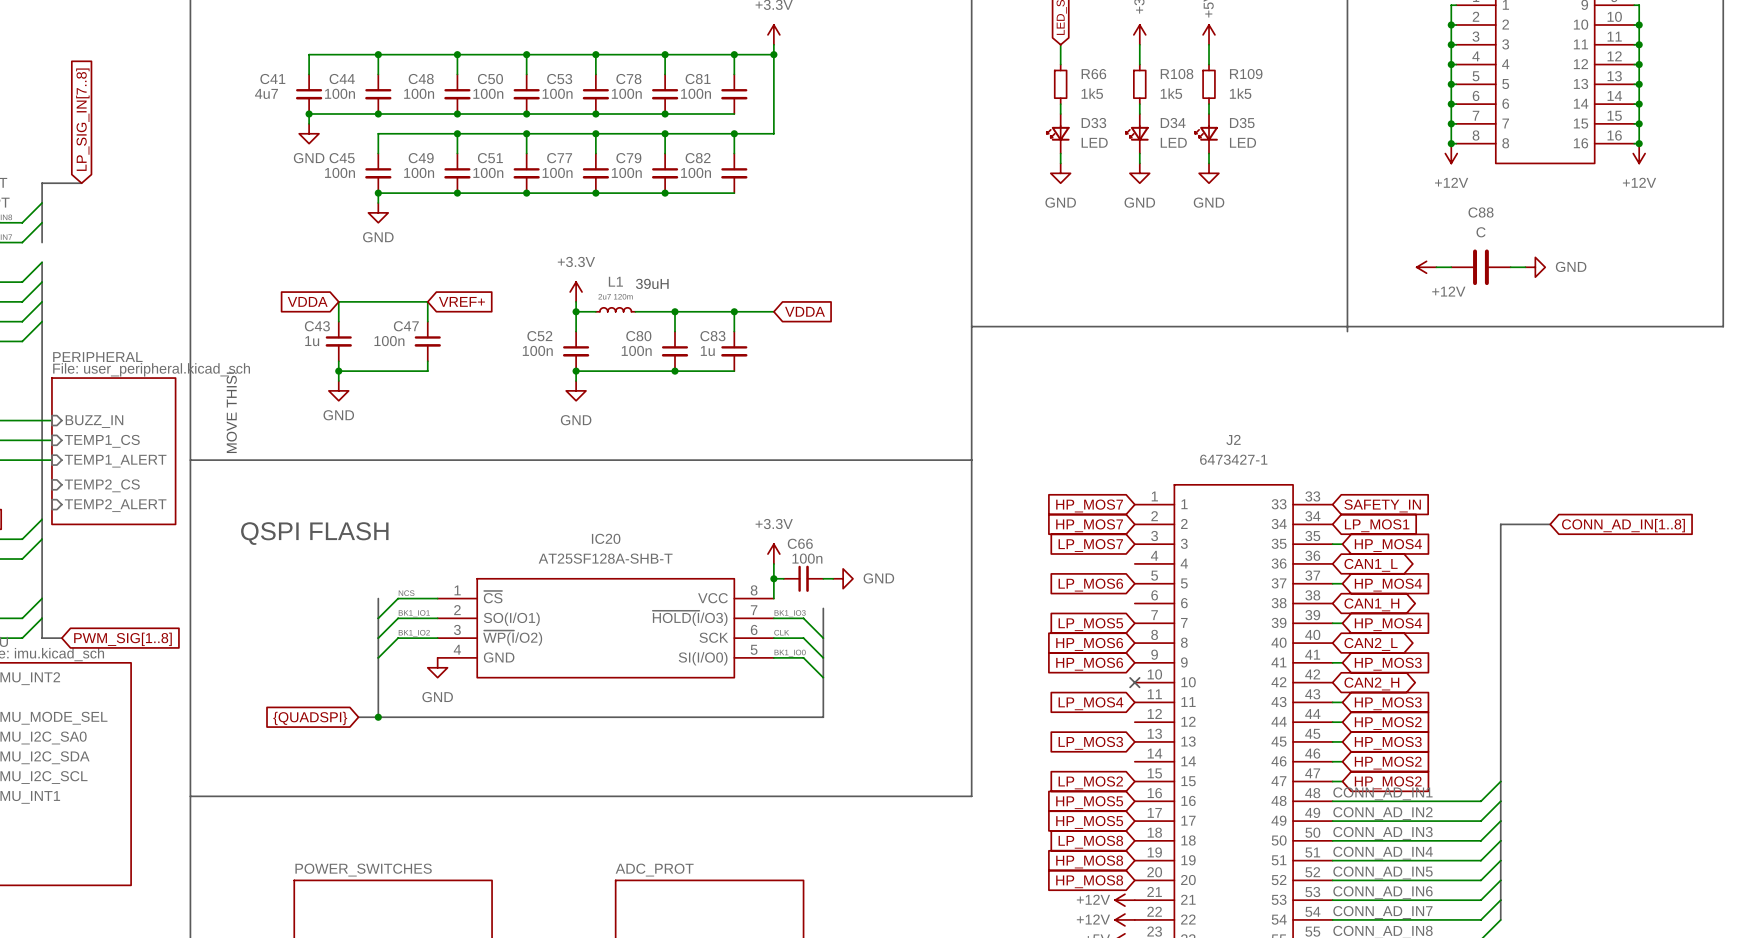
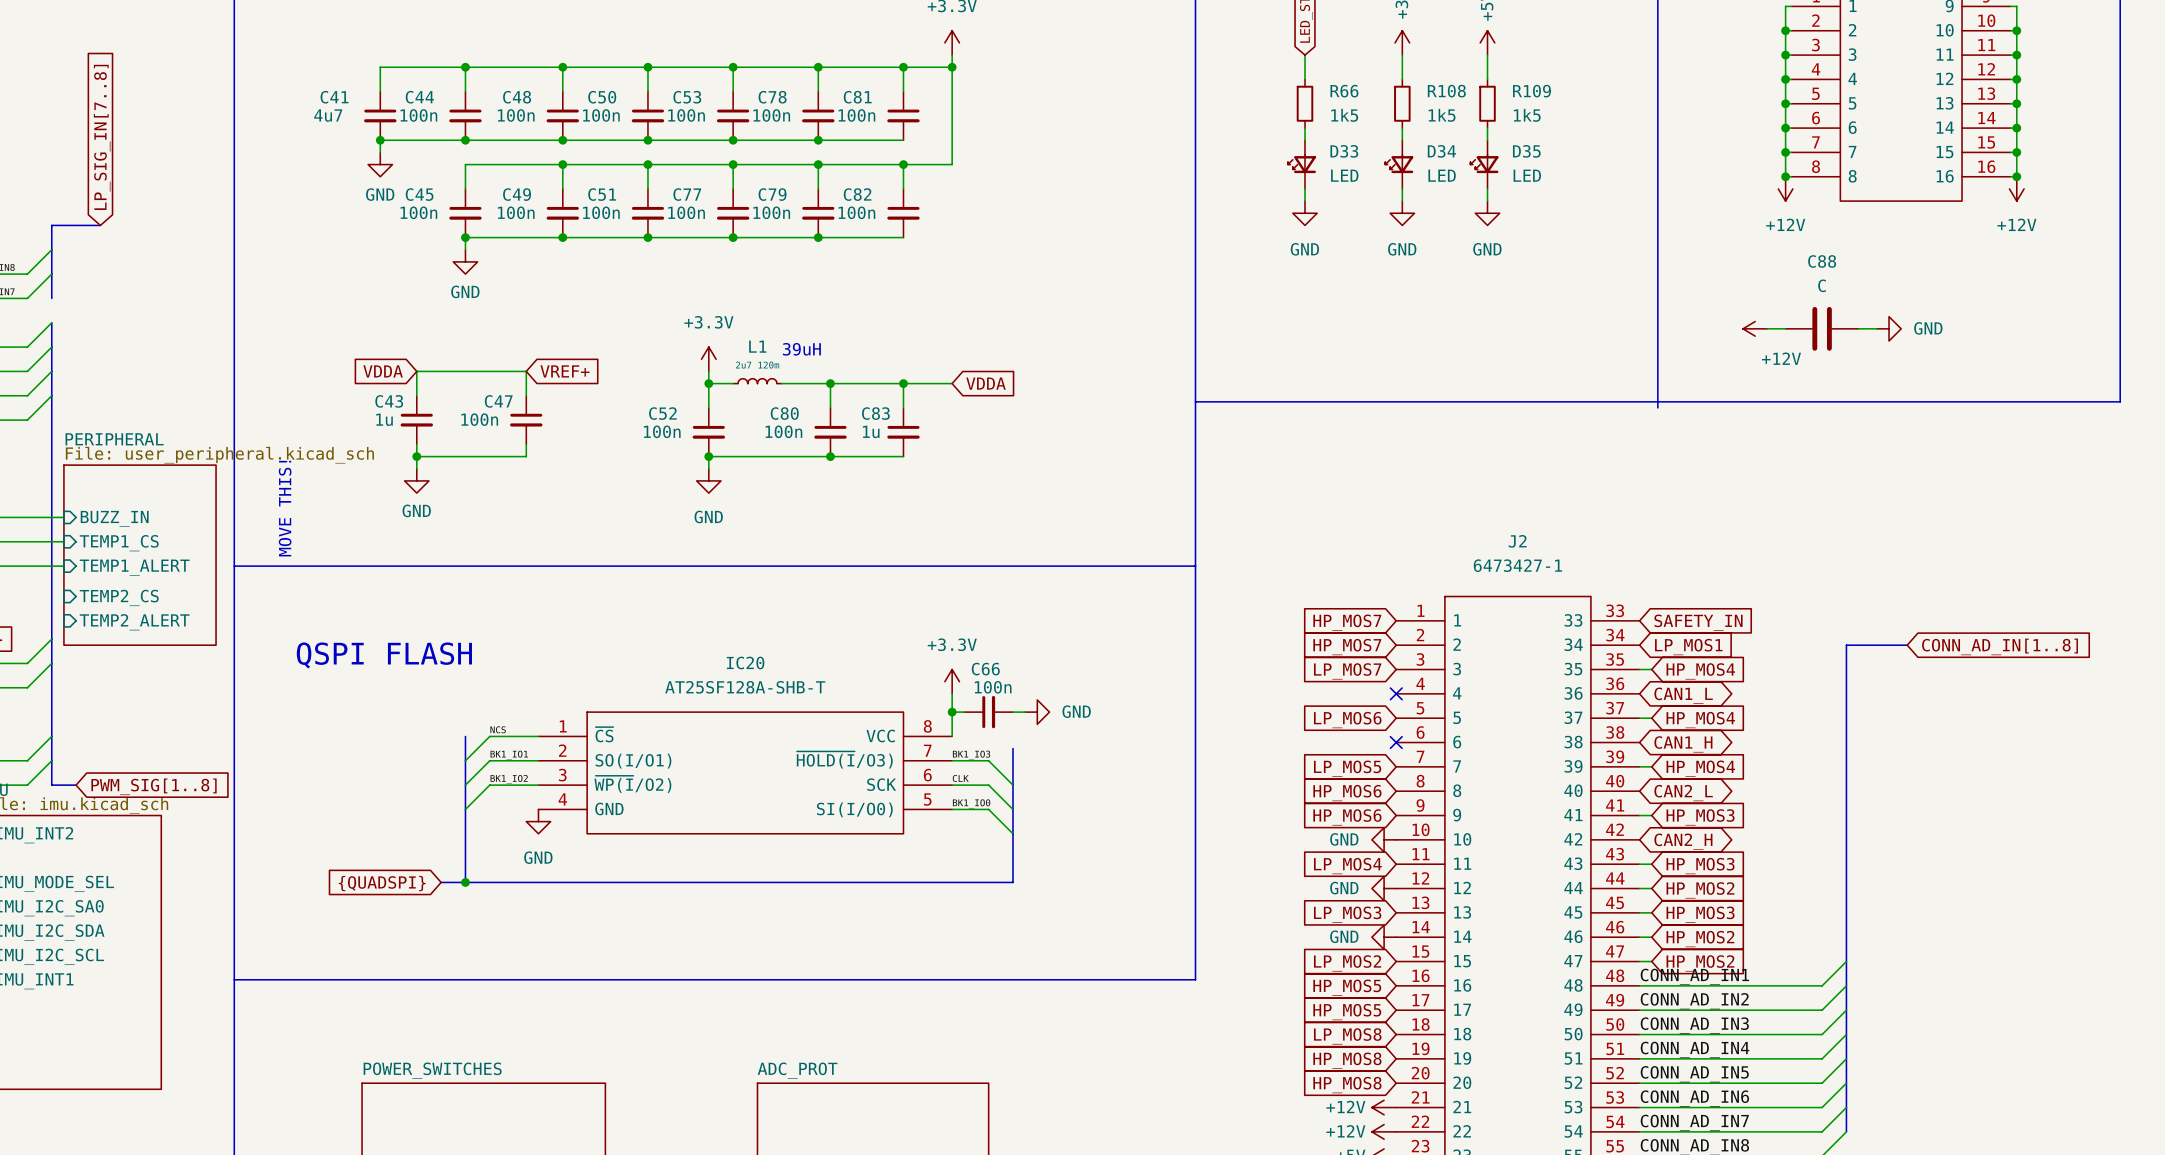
no-connect mark: none -> (1396, 693)
no-connect mark: none -> (1396, 742)
power symbol: none -> GND (1384, 839)
no-connect mark: (1134, 682) -> none
power symbol: none -> GND (1384, 888)
power symbol: none -> GND (1384, 937)

